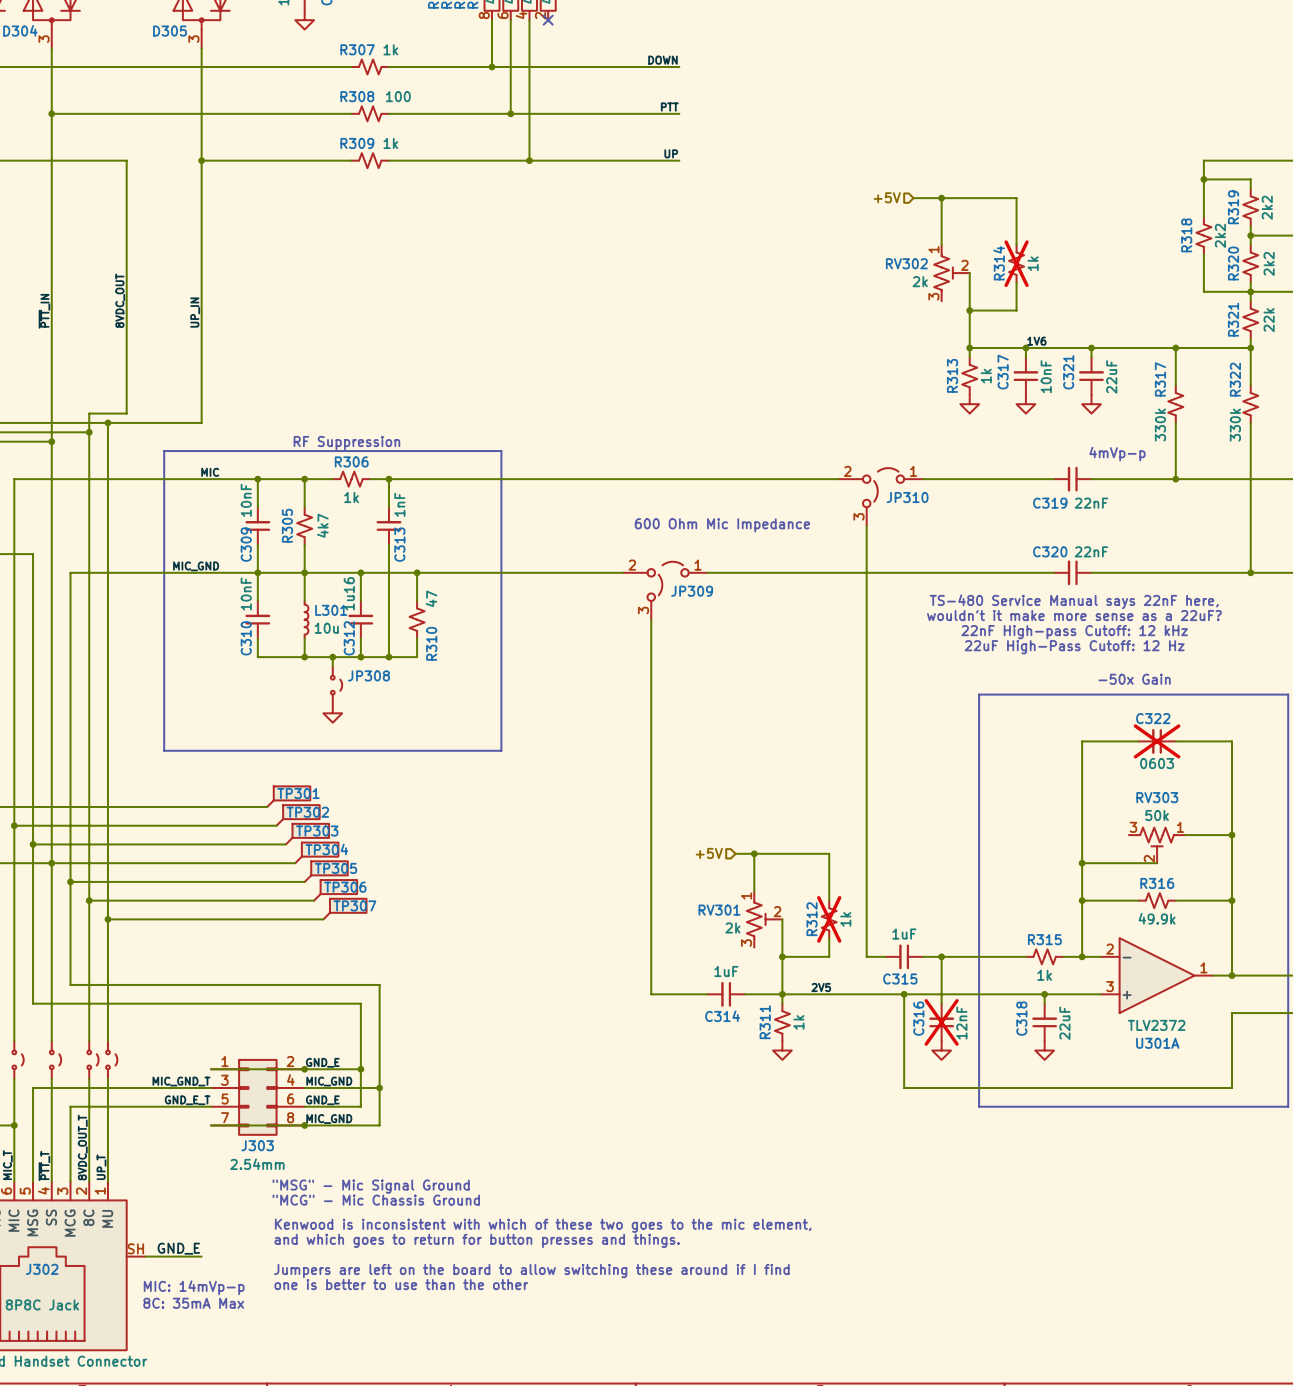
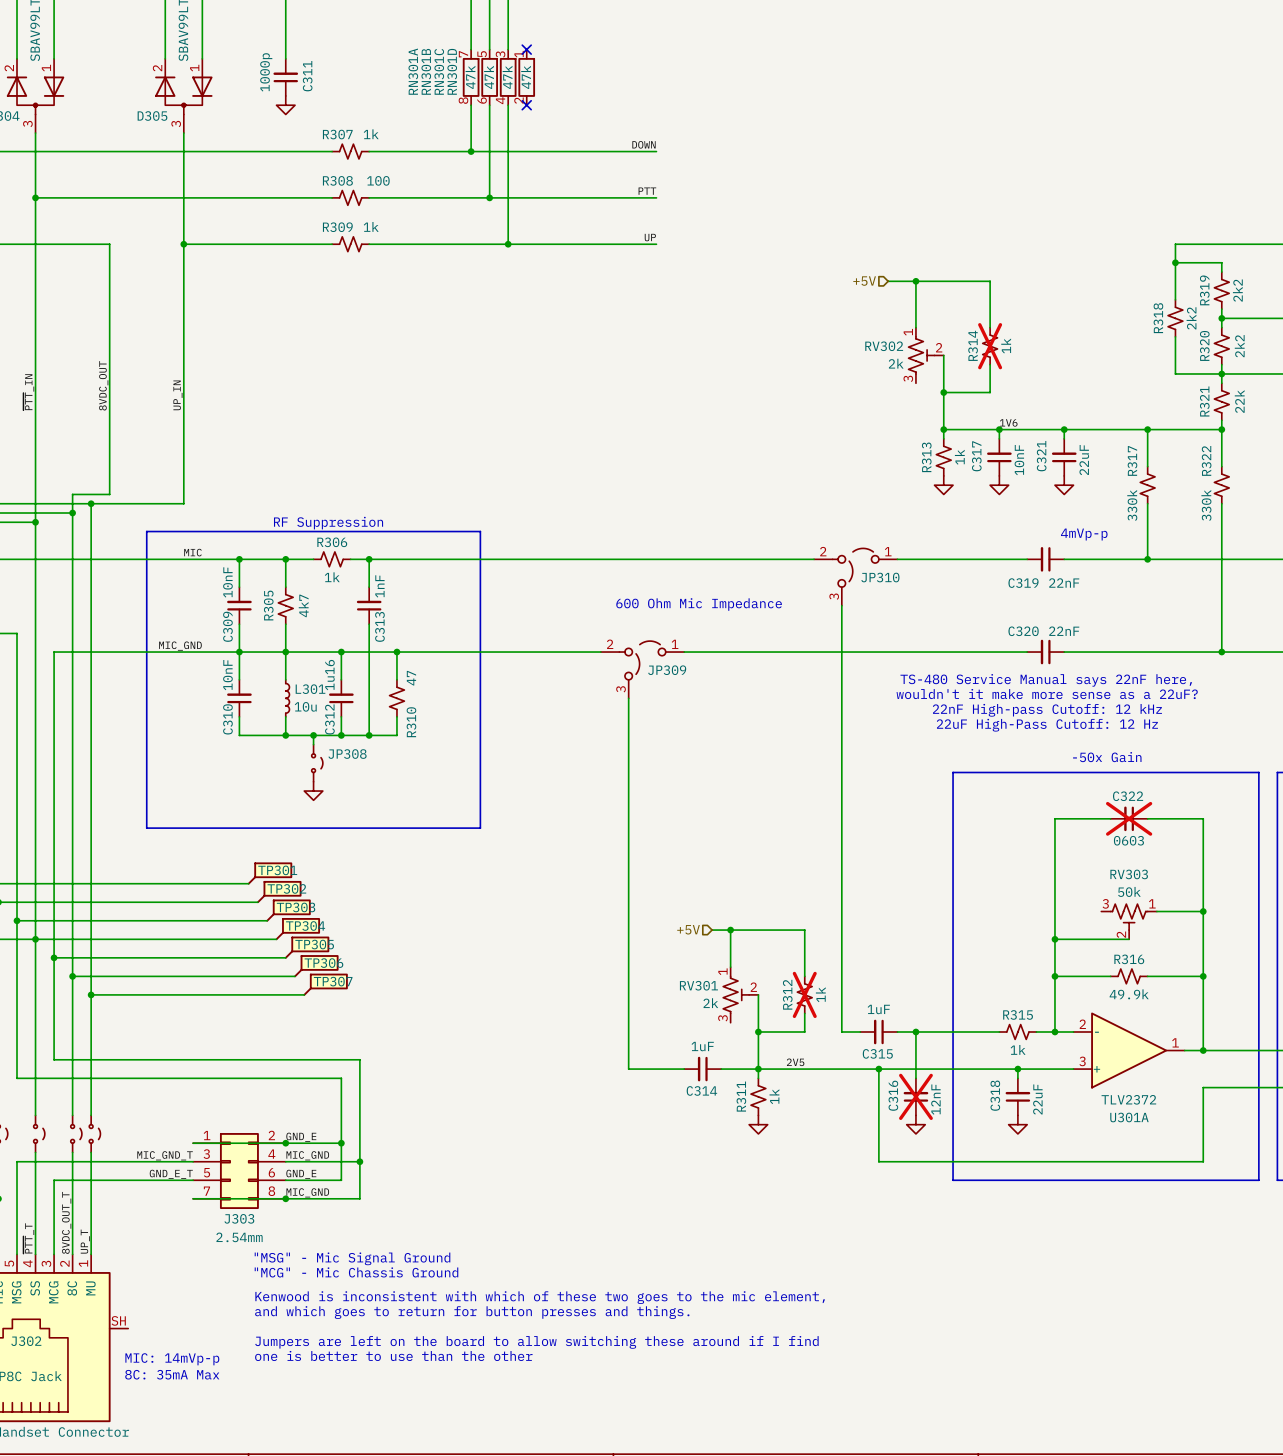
label: GND_E (178, 1248) -> none
wire: (145, 1256) (201, 1256) -> none

